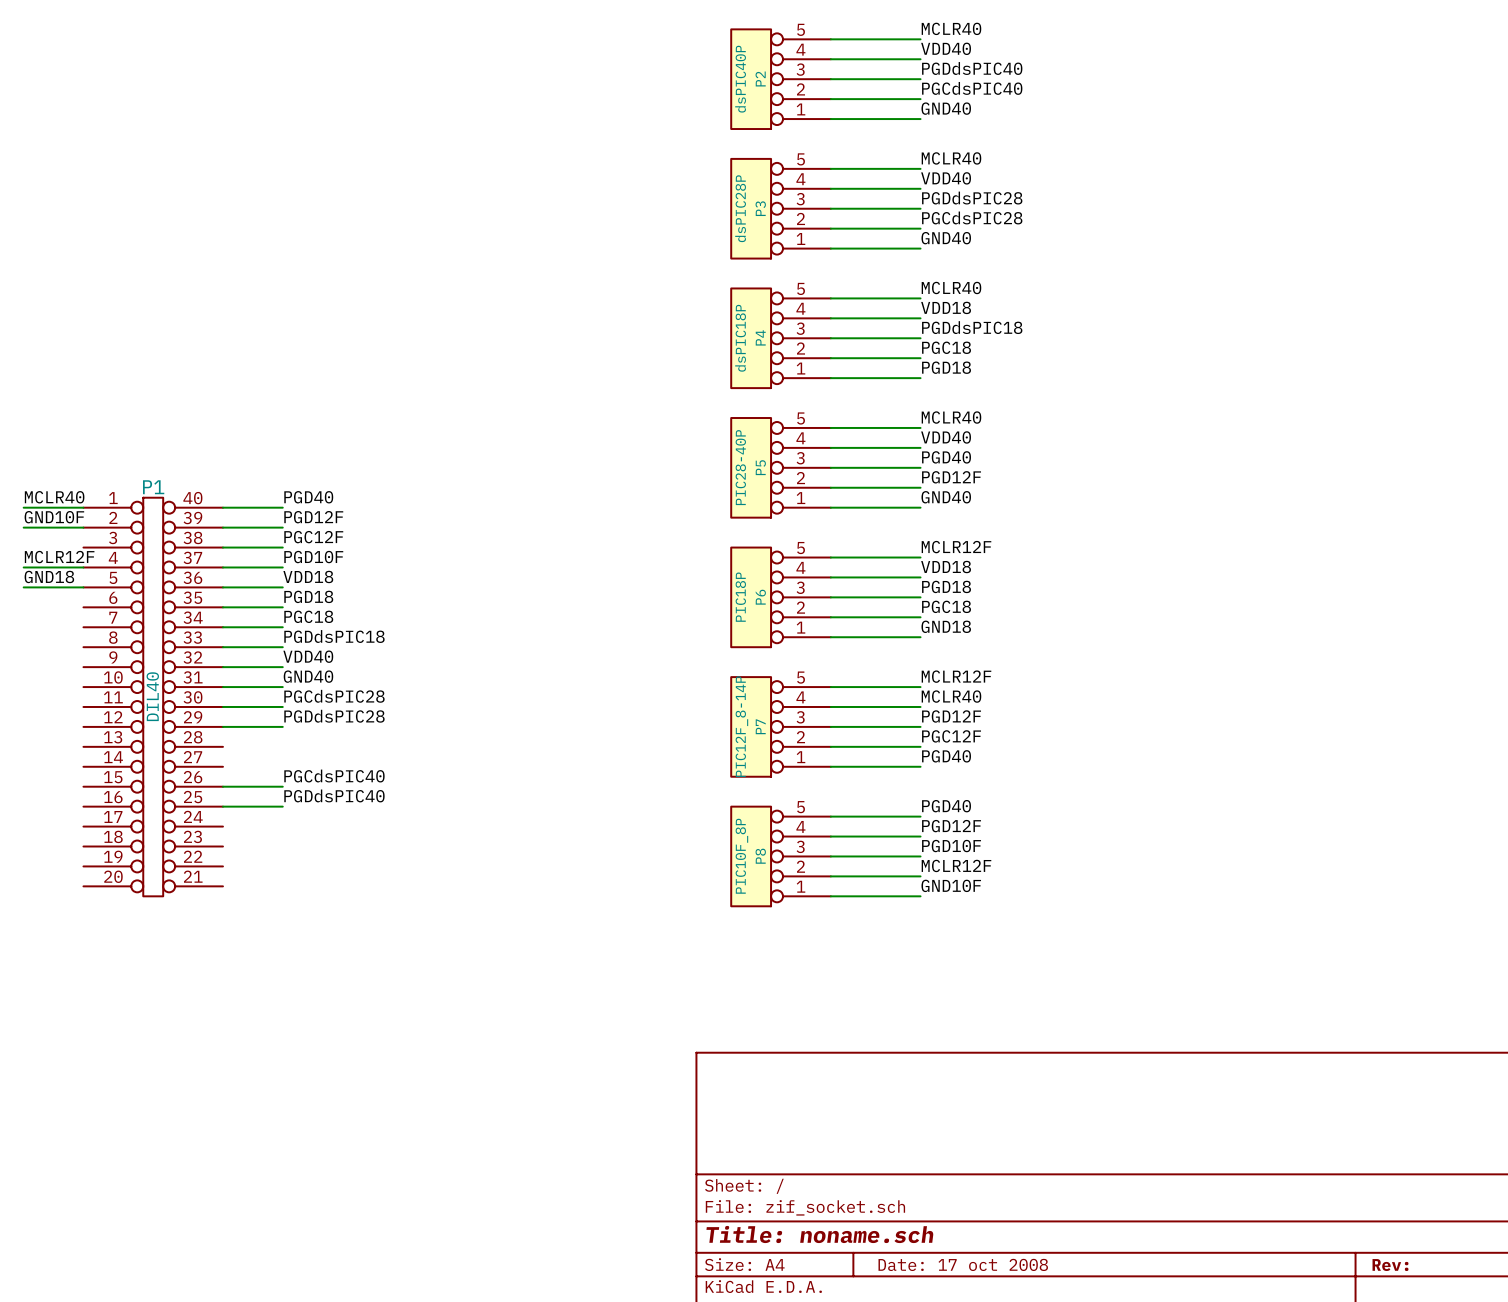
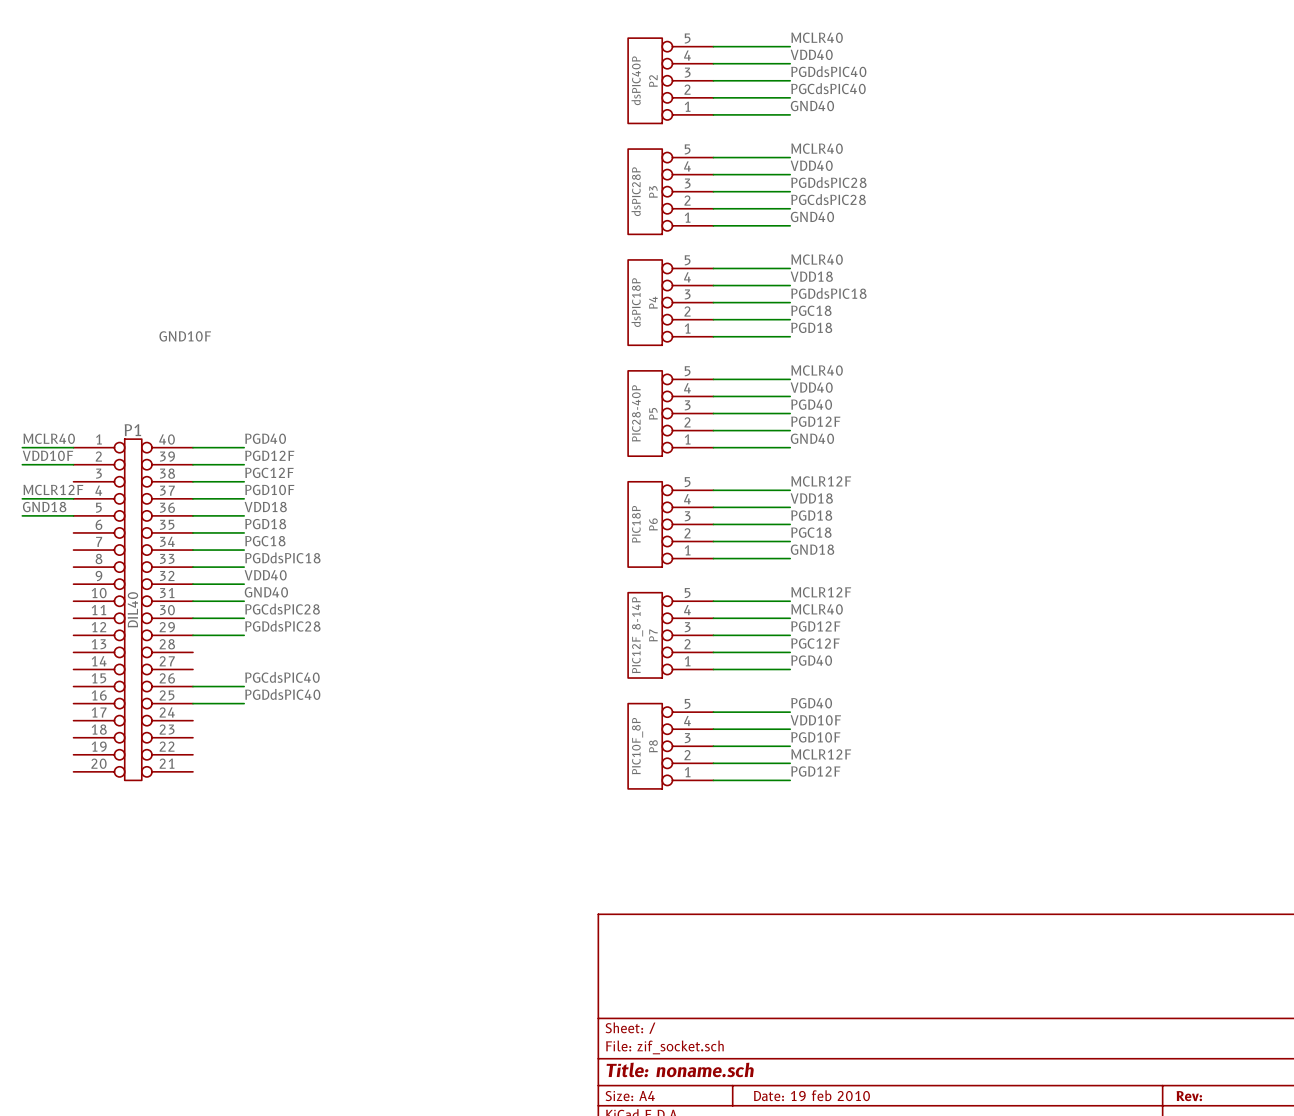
label: none -> GND10F (185, 336)
label: GND10F (54, 517) -> VDD10F (47, 455)
label: PGD12F (951, 826) -> VDD10F (815, 720)
label: GND10F (951, 885) -> PGD12F (815, 771)
title block: Date: 17 oct 2008 (963, 1264) -> Date: 19 feb 2010 (811, 1095)

